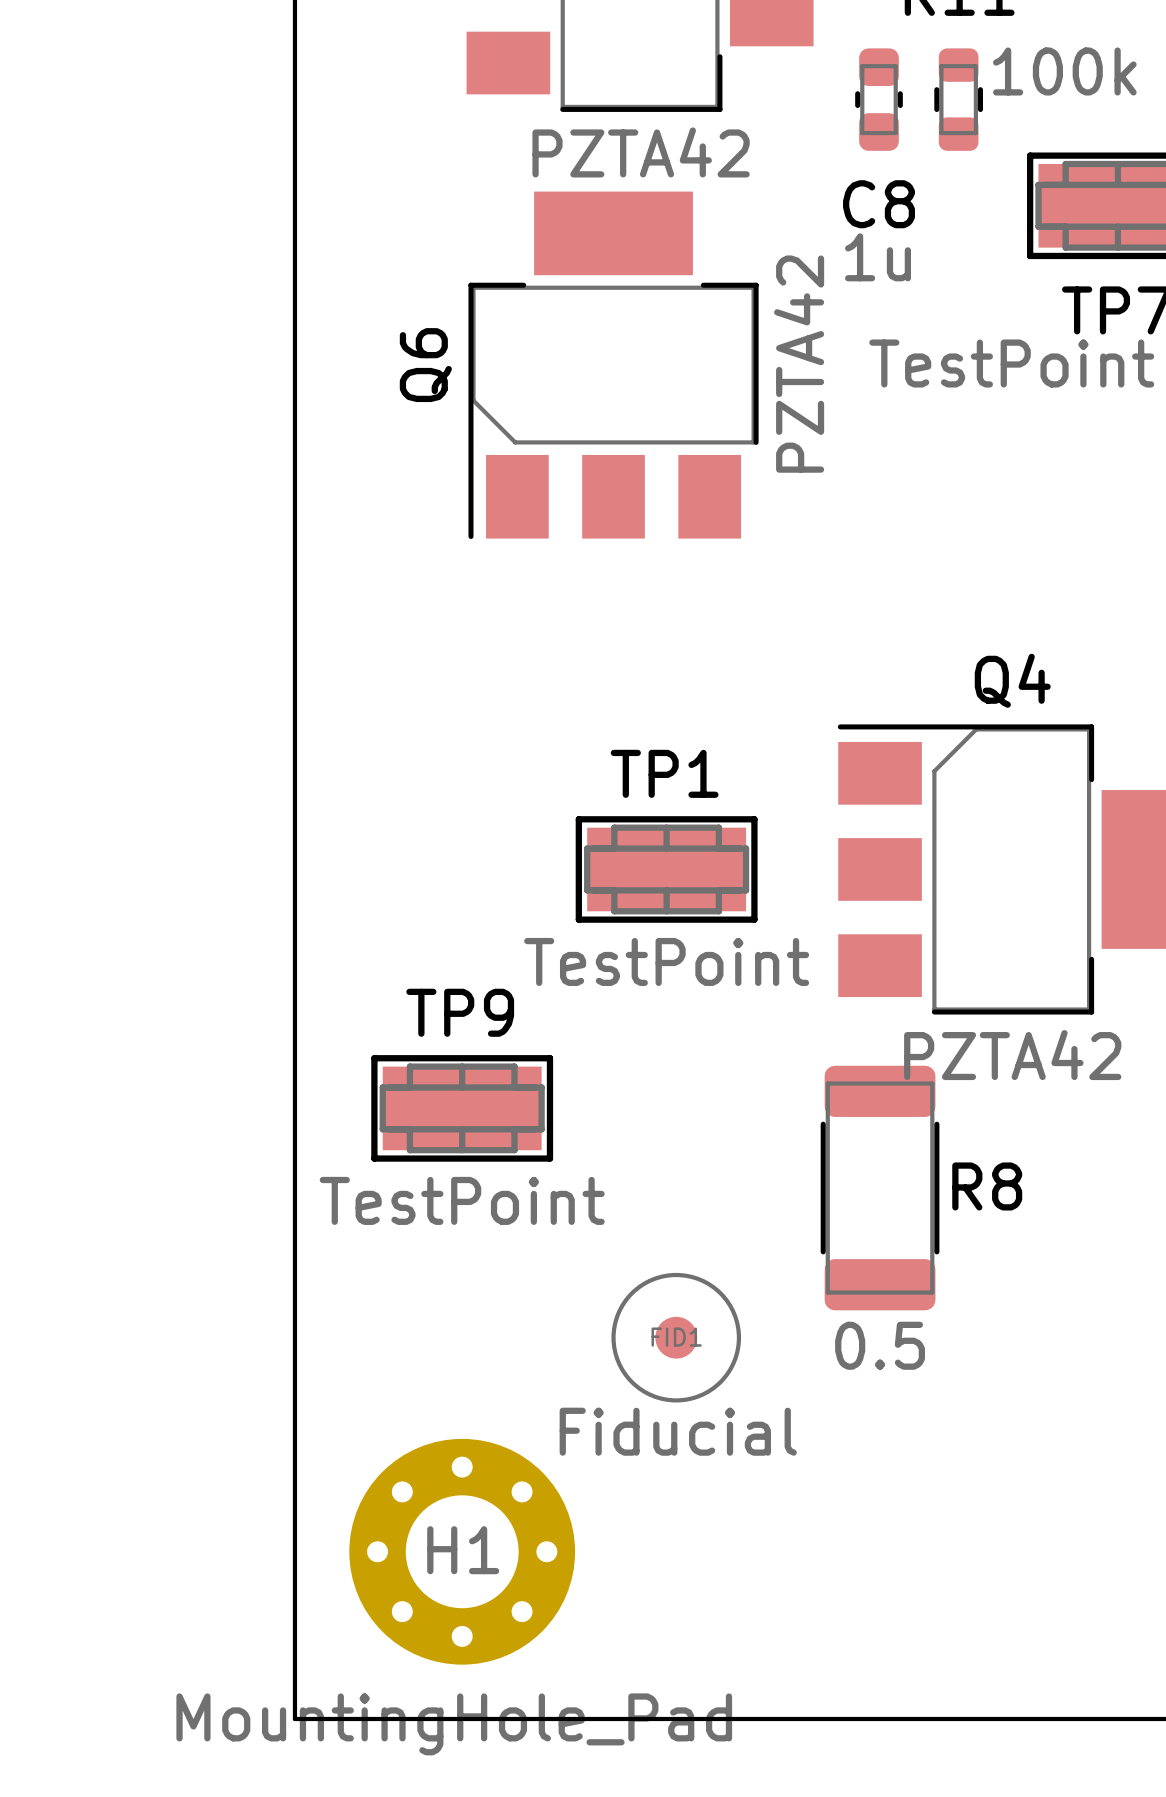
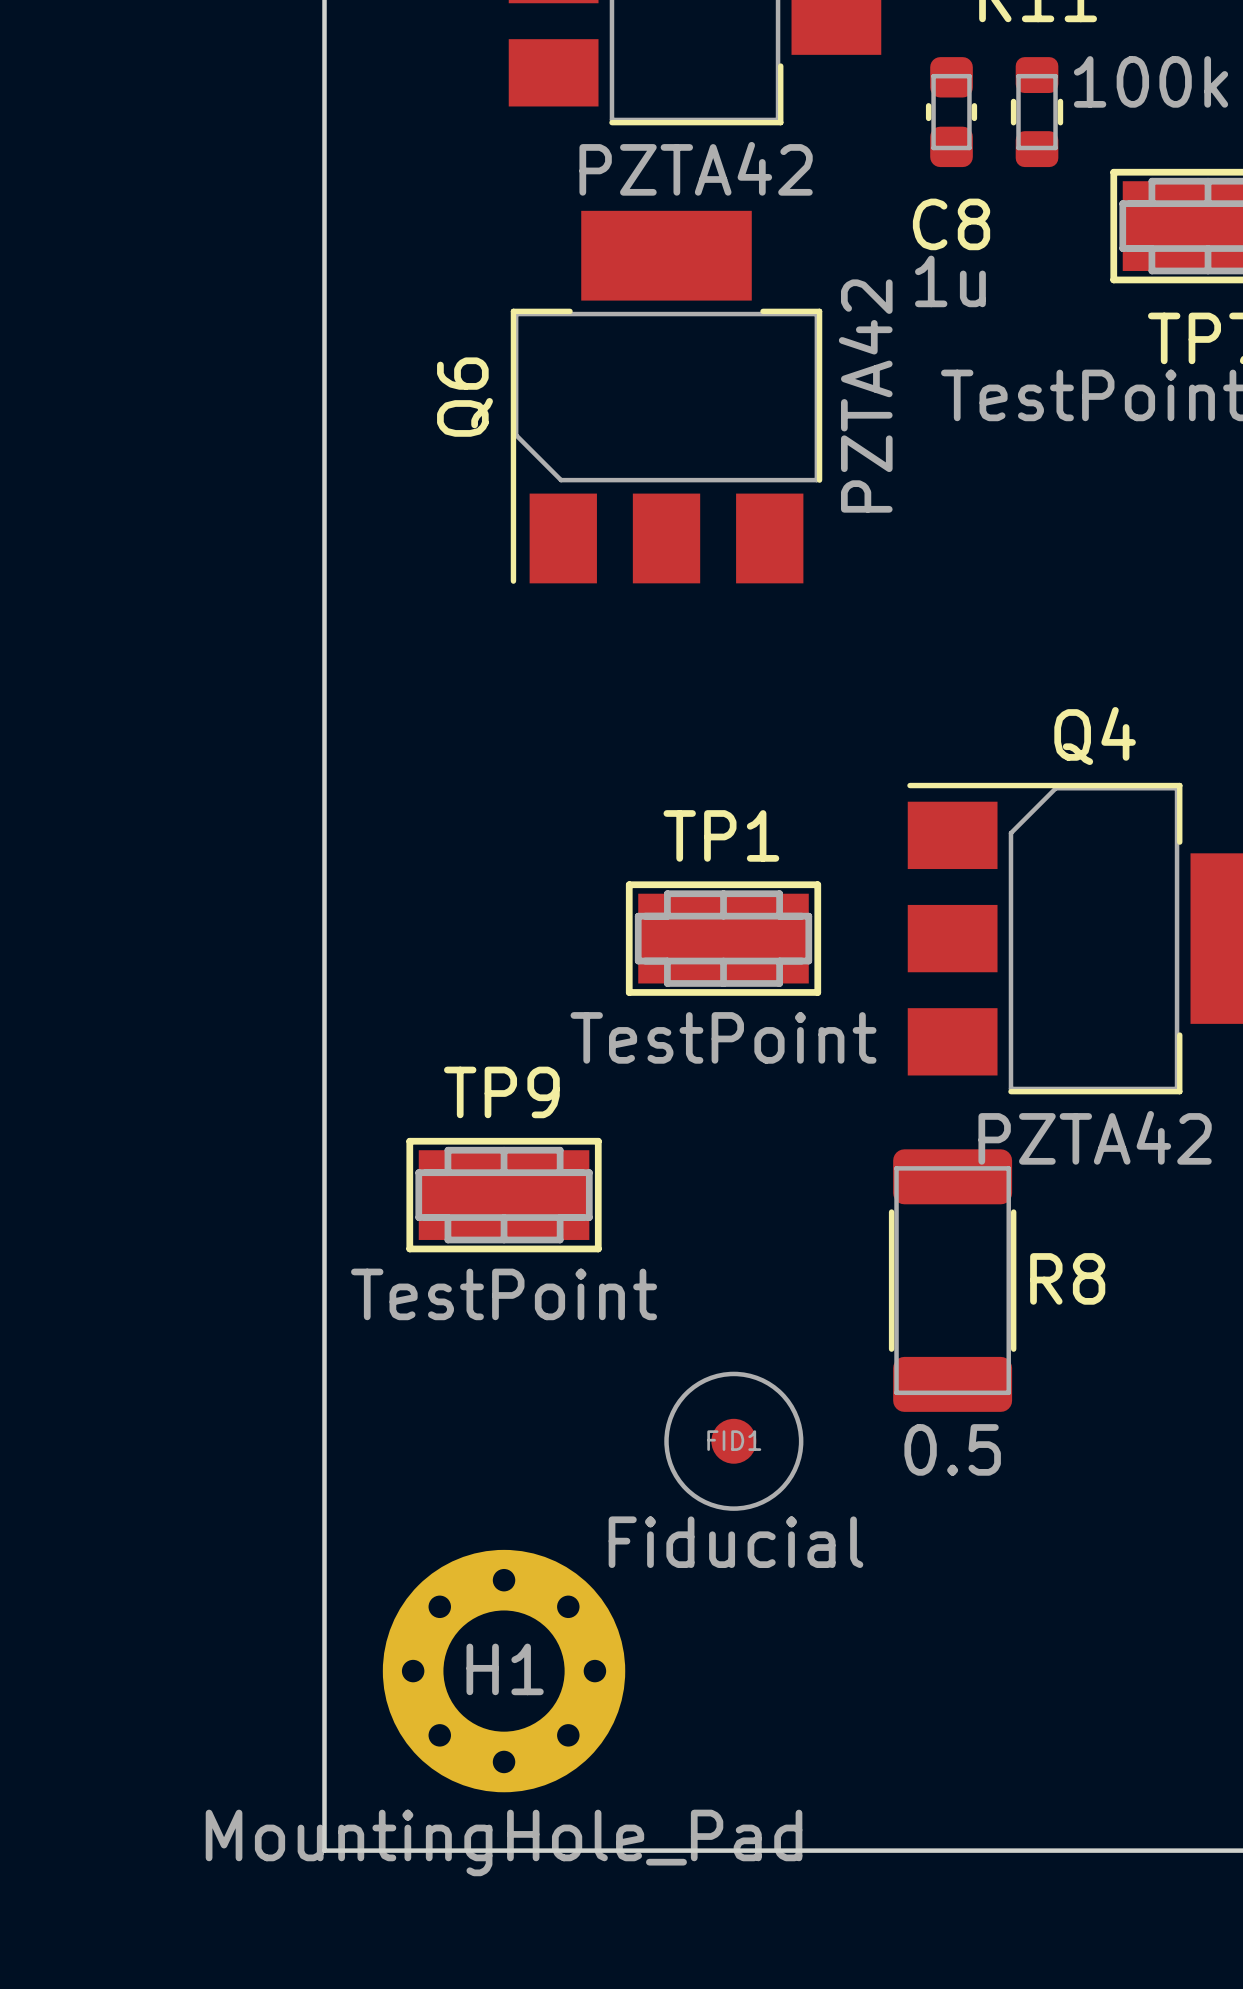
H1 value position: MountingHole_Pad (454, 1724) -> MountingHole_Pad (504, 1842)

